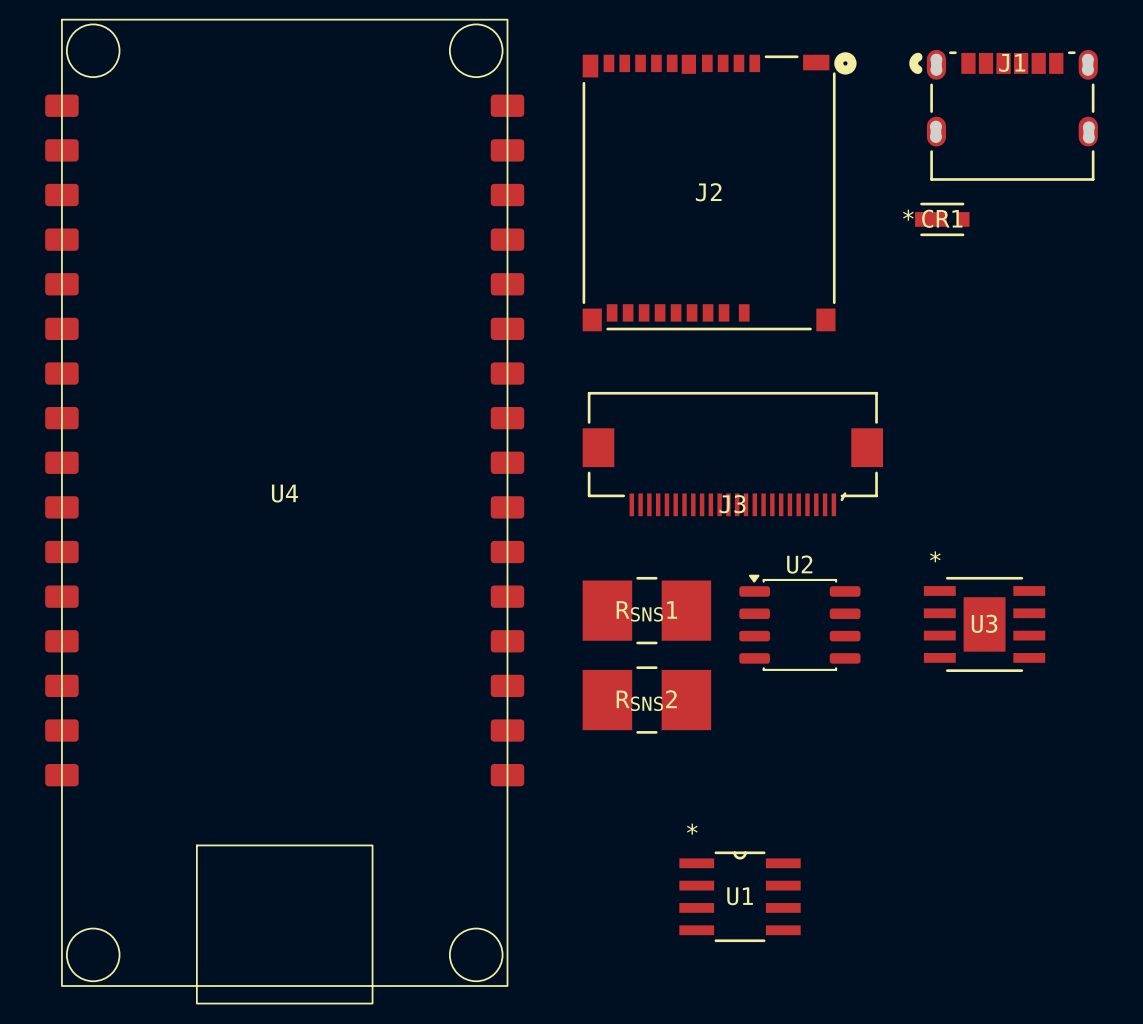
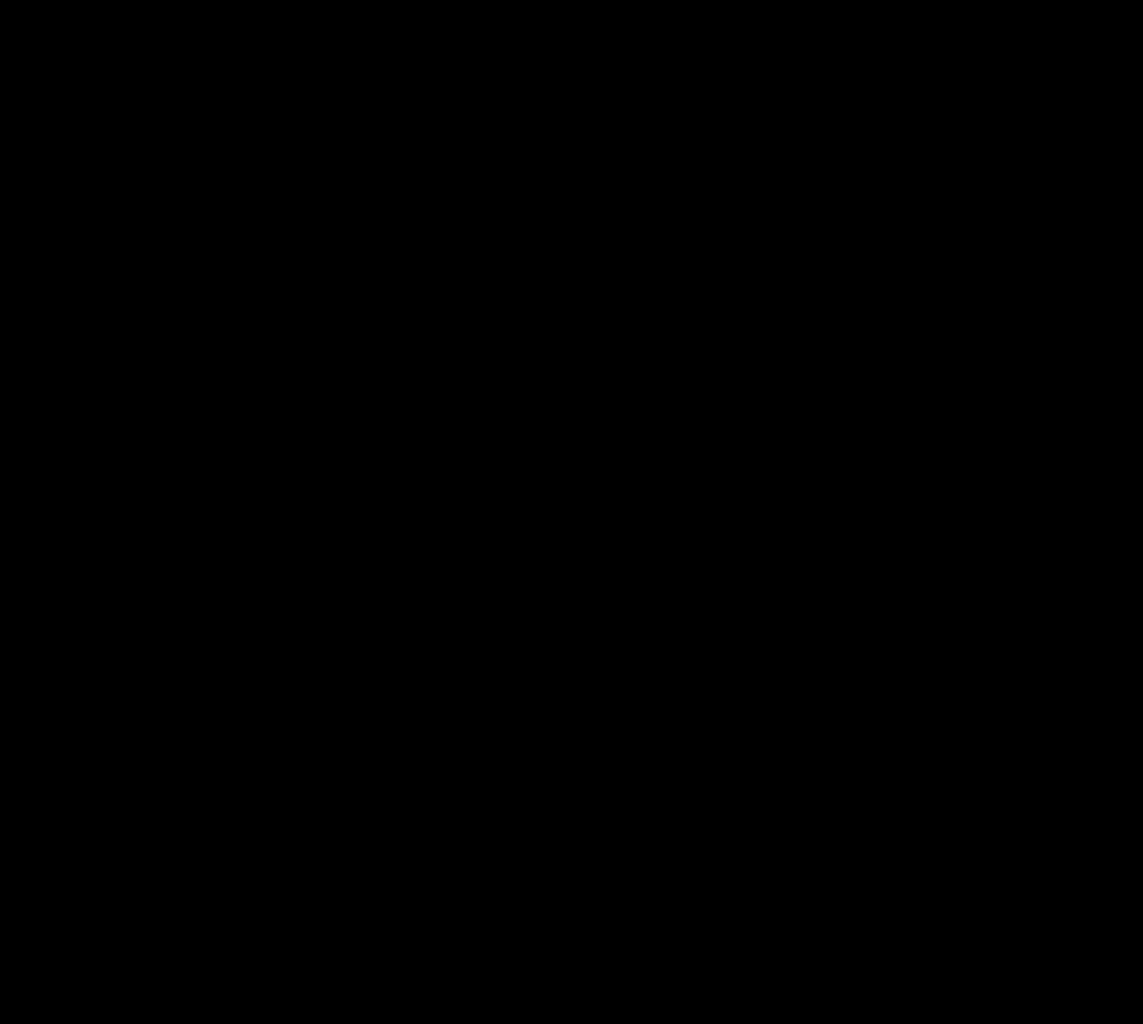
J1: (1003, 115) -> none
J2: (719, 191) -> none
CR1: (942, 219) -> none
J3: (732, 454) -> none
U4: (284, 511) -> none
RSNS1: (646, 610) -> none
U2: (799, 622) -> none
U3: (984, 624) -> none
RSNS2: (646, 700) -> none
U1: (740, 896) -> none

